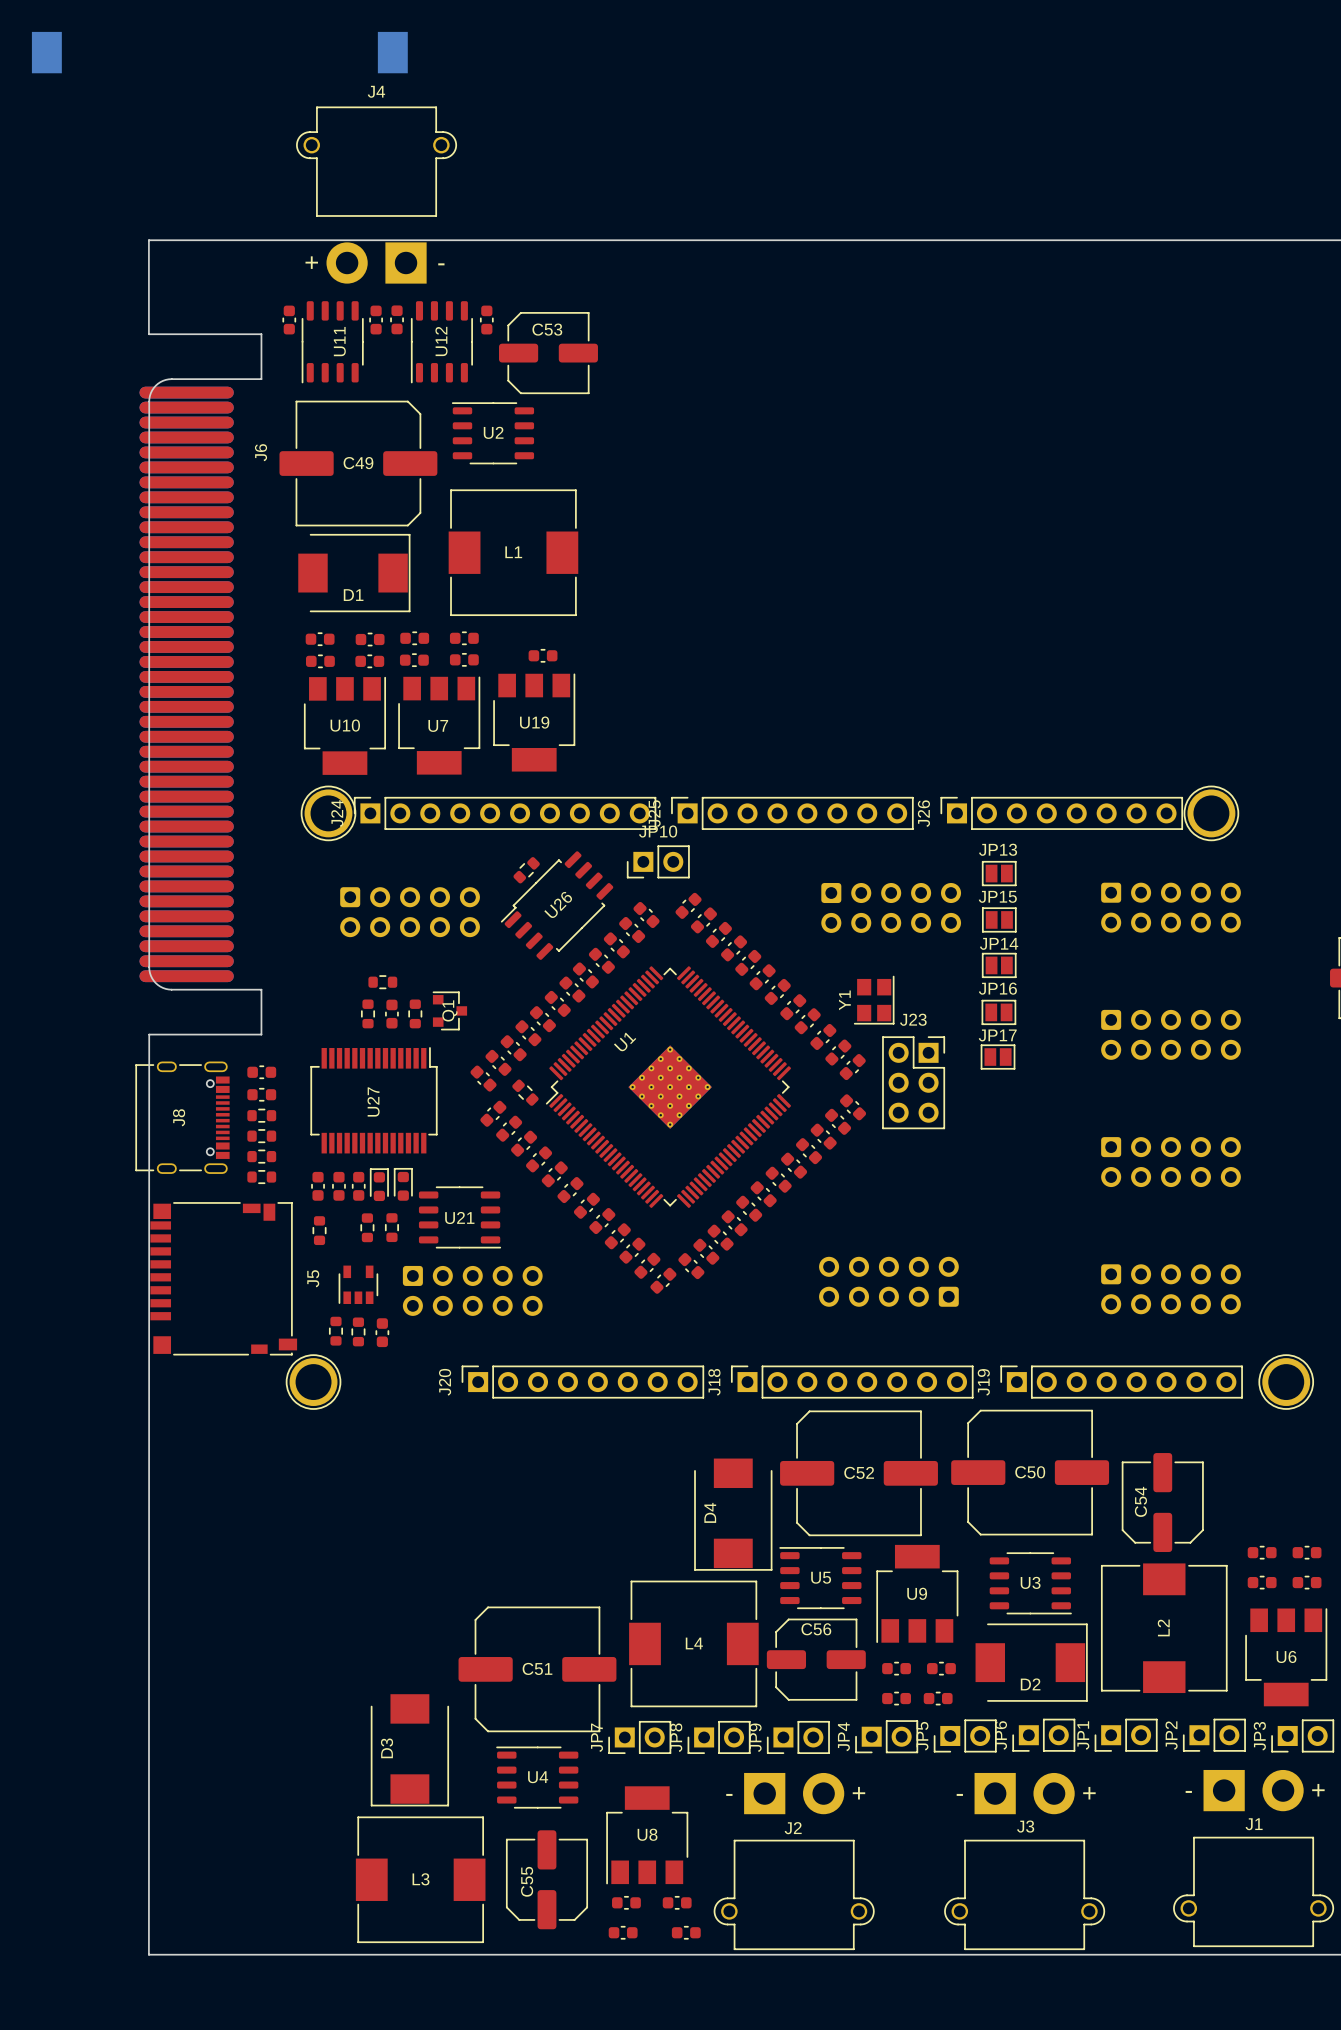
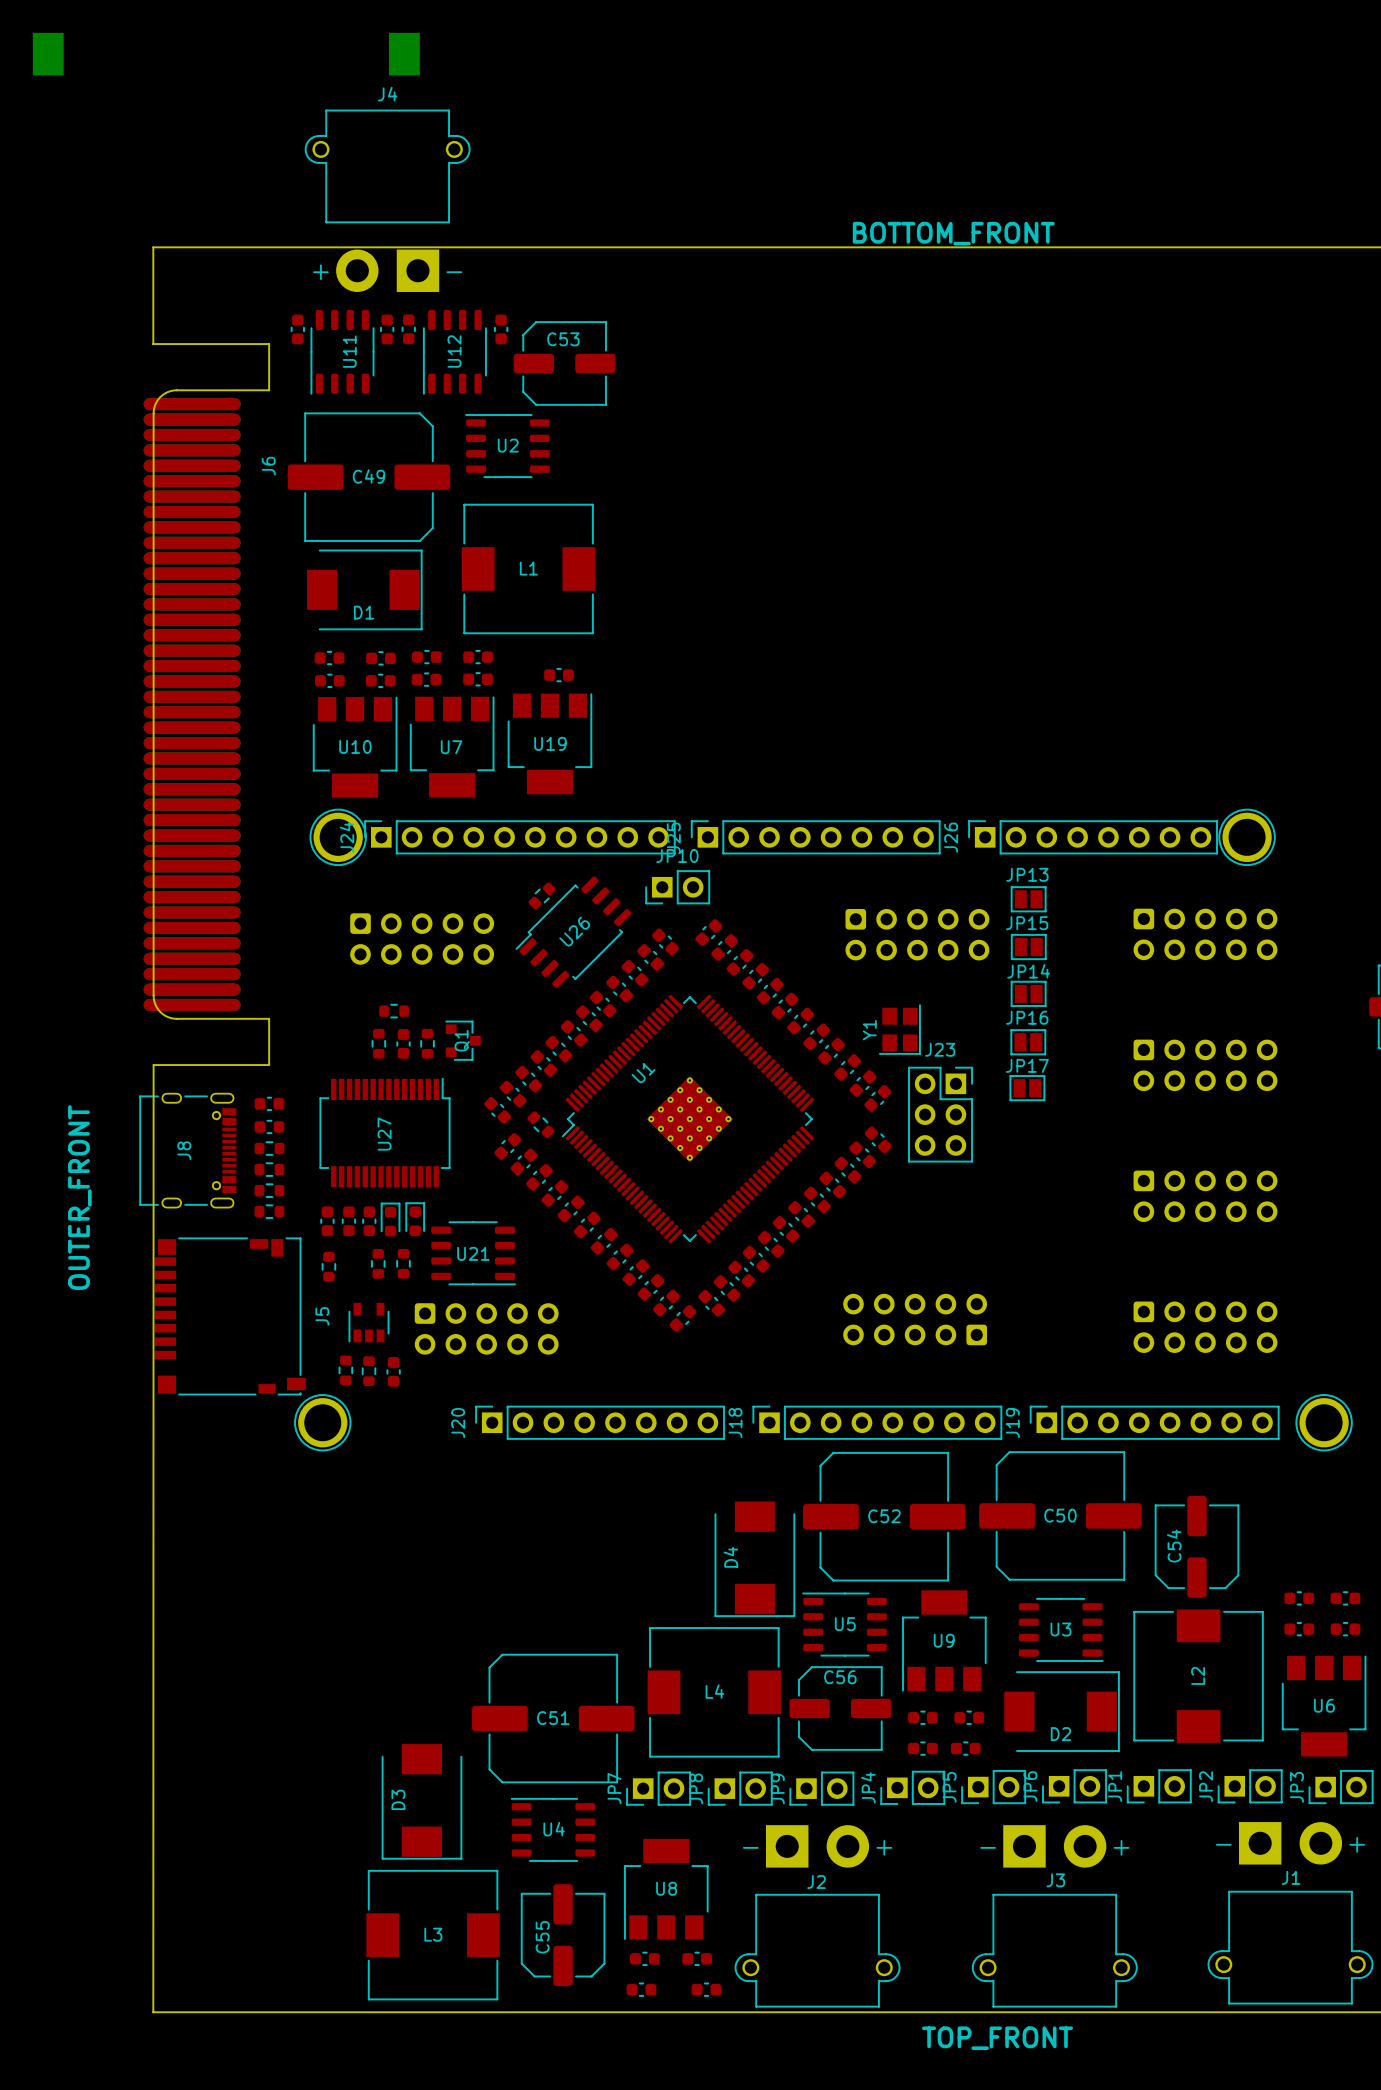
text: none -> BOTTOM_FRONT (953, 233)
text: none -> OUTER_FRONT (79, 1197)
text: none -> TOP_FRONT (997, 2038)

